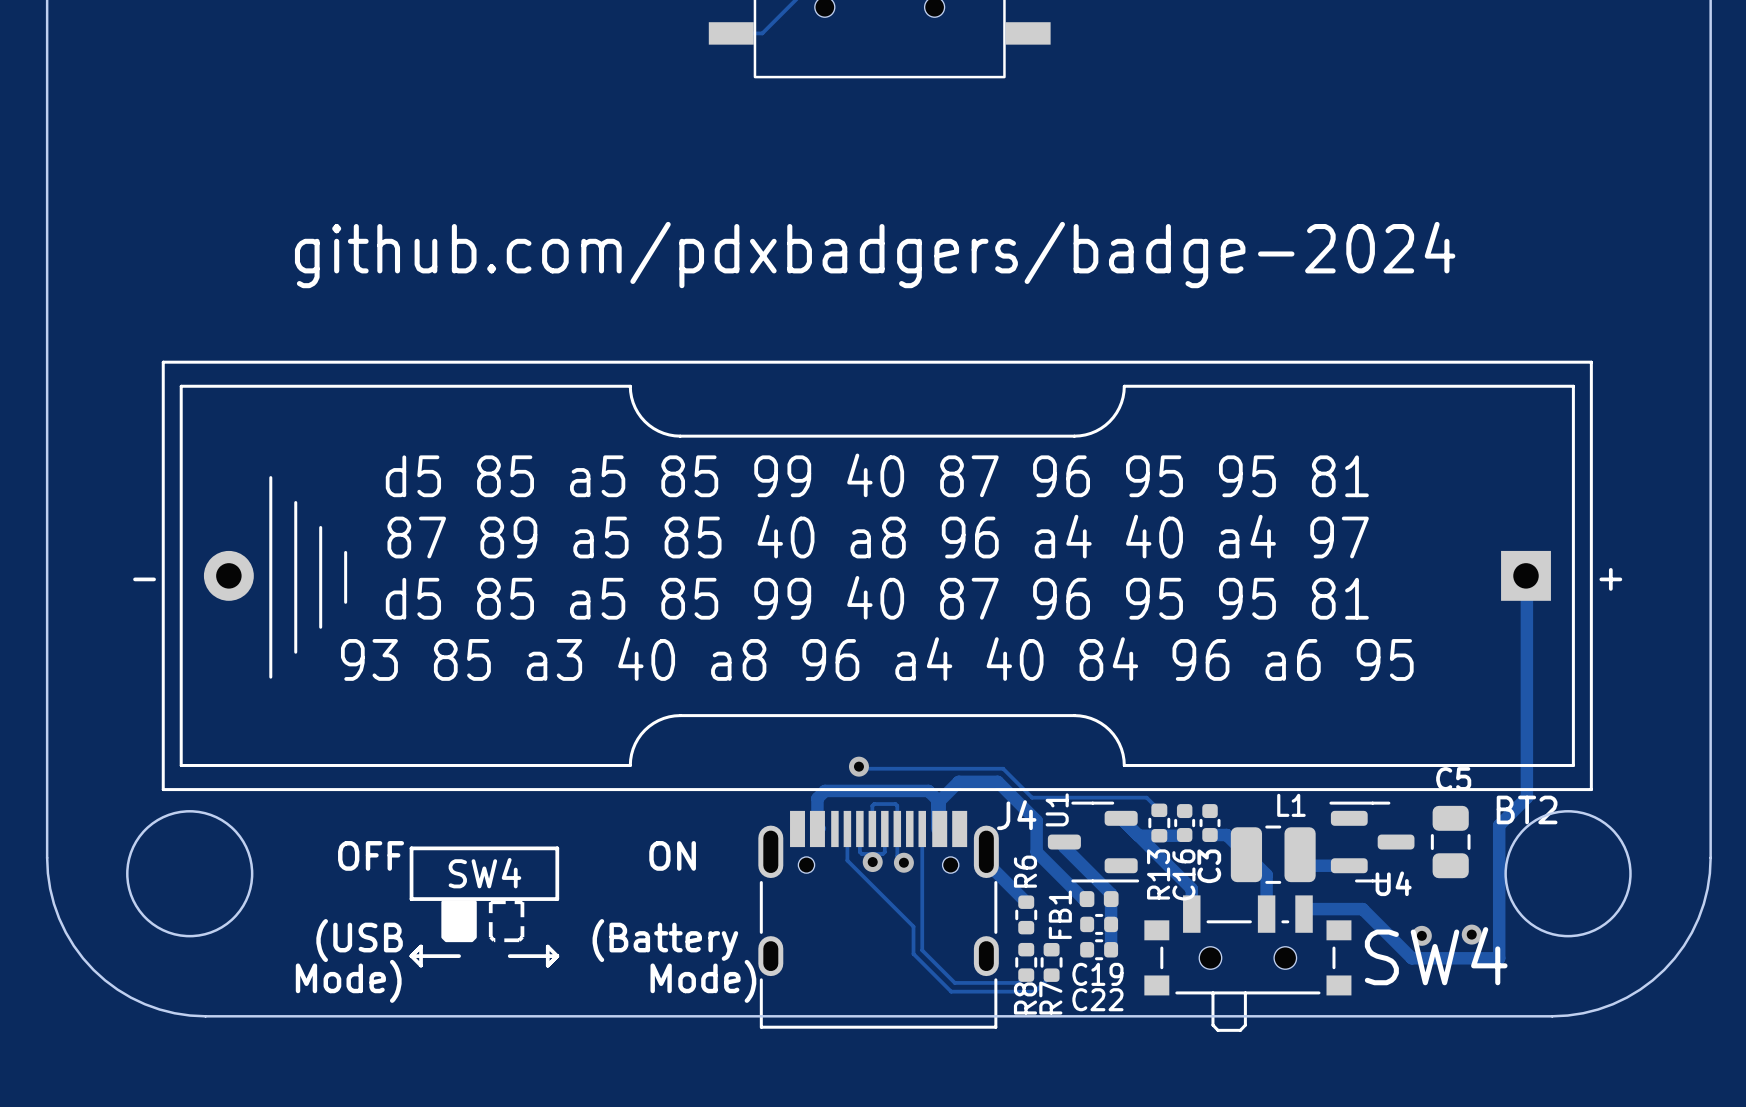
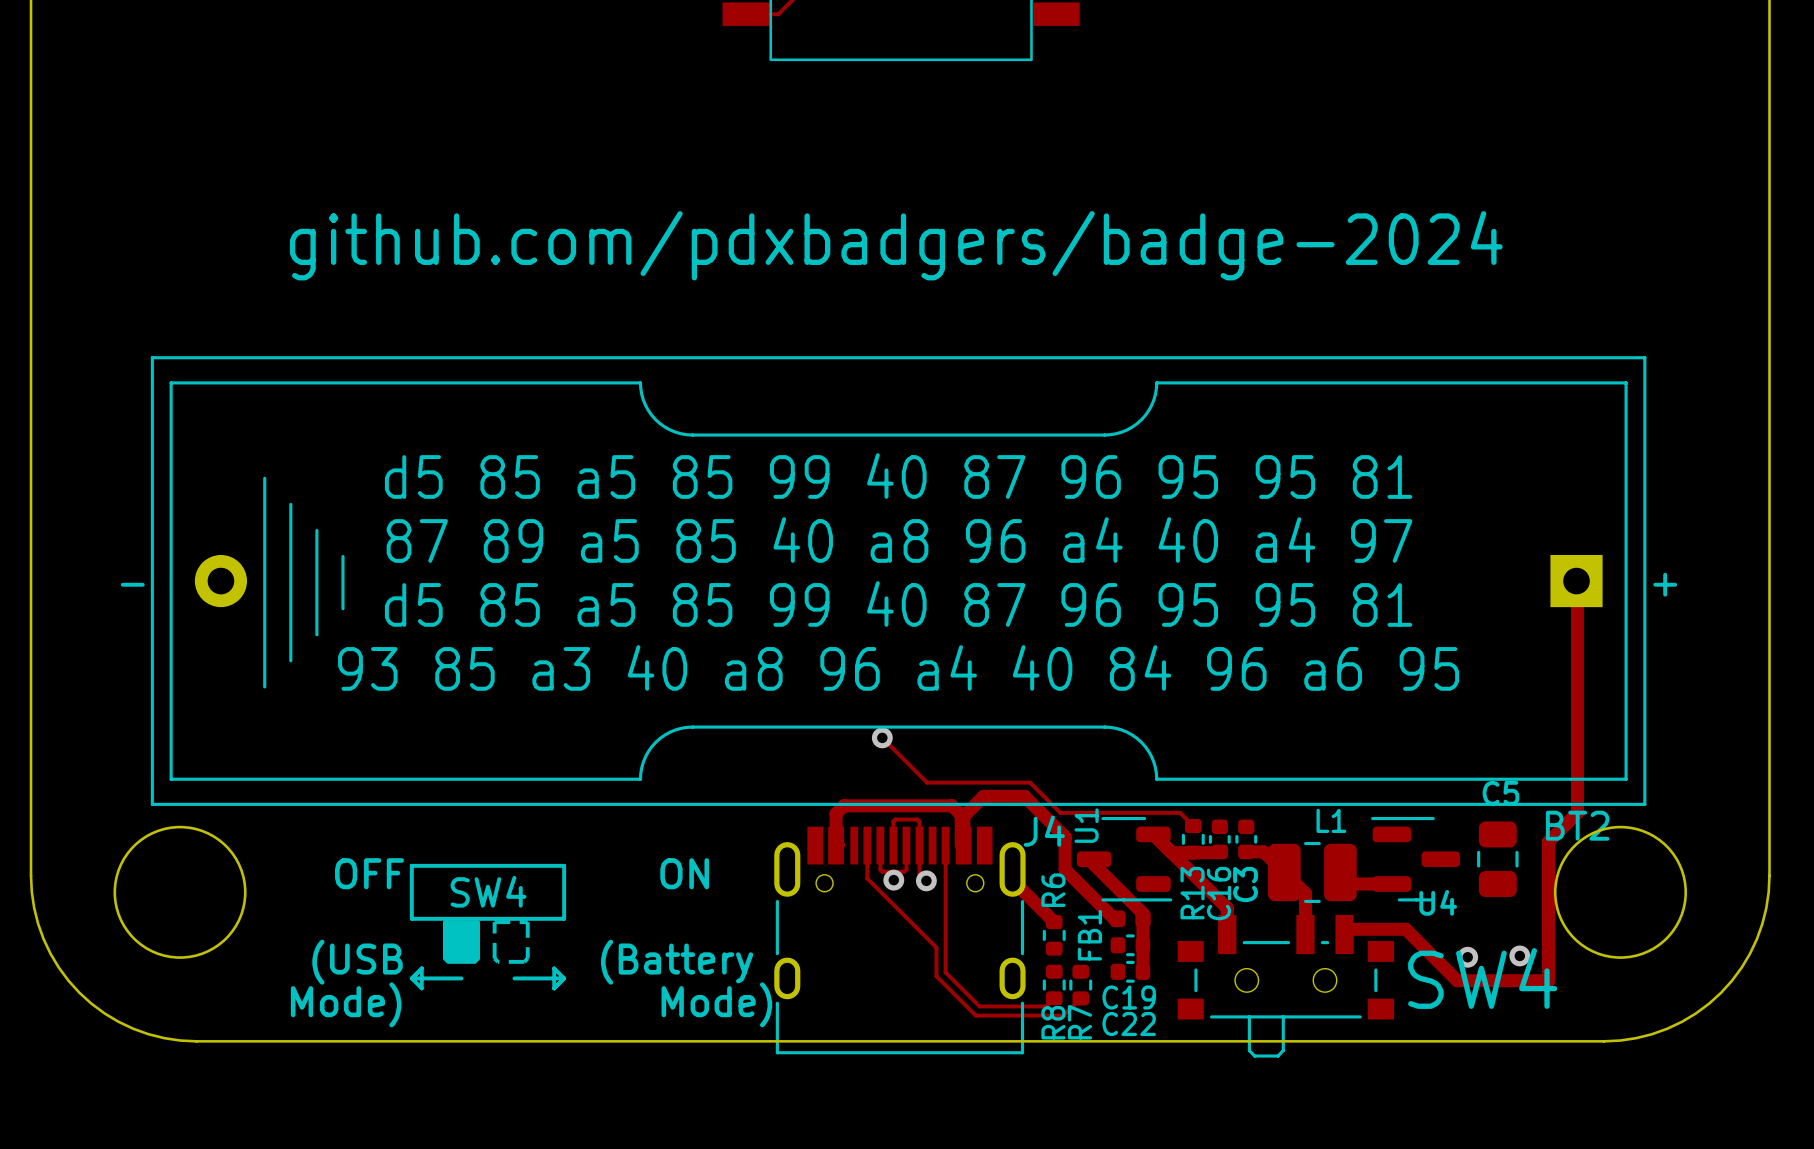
track: (858, 766) (861, 768) (904, 768) -> (882, 737) (927, 782)
via position: (858, 766) -> (882, 737)

